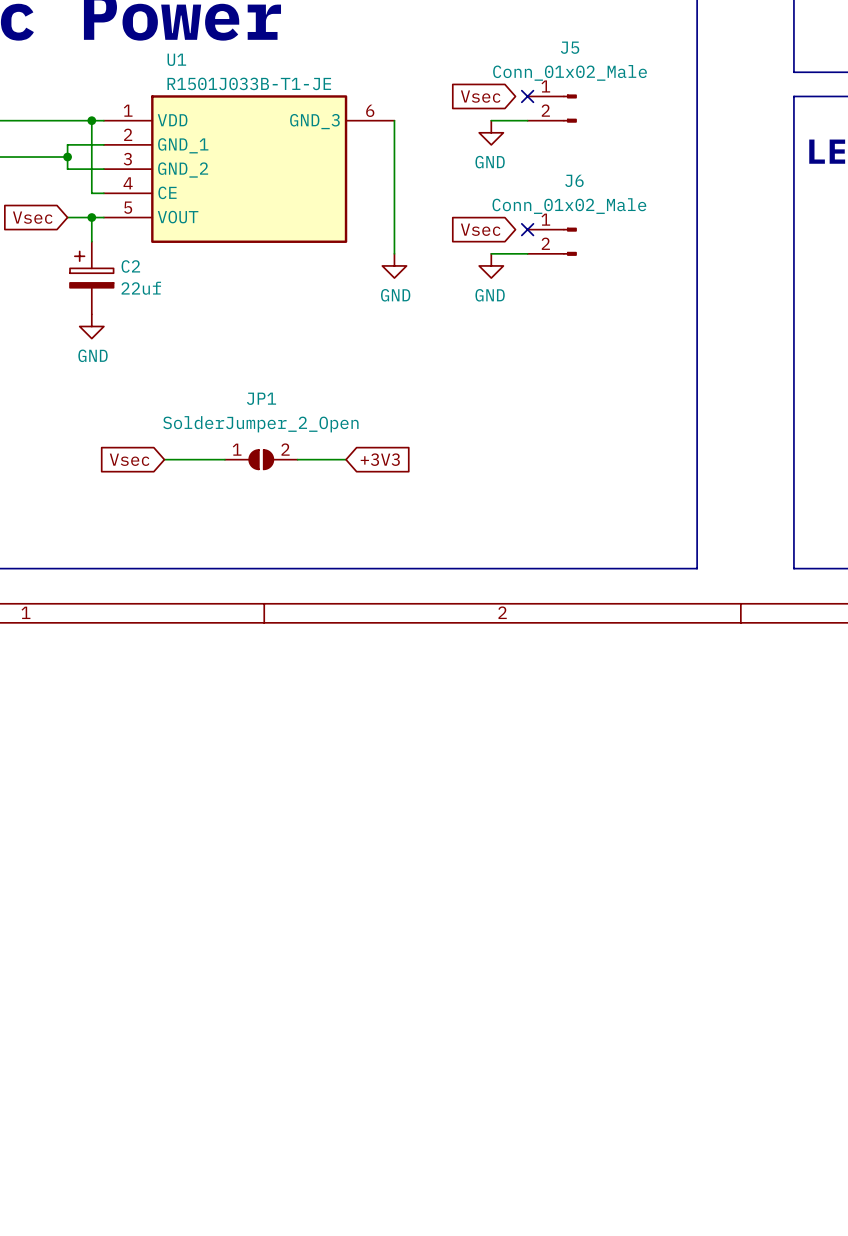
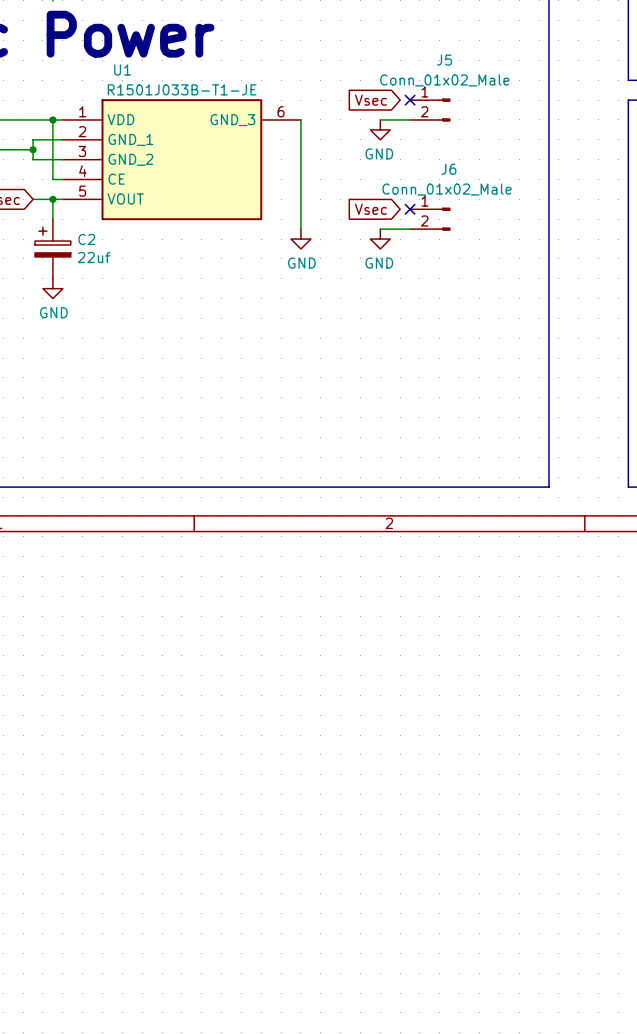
global label: Vsec (129, 459) -> none
wire: (164, 459) (224, 459) -> none
JP1: SolderJumper_2_Open (261, 459) -> none
wire: (297, 459) (346, 459) -> none
global label: +3V3 (380, 459) -> none

